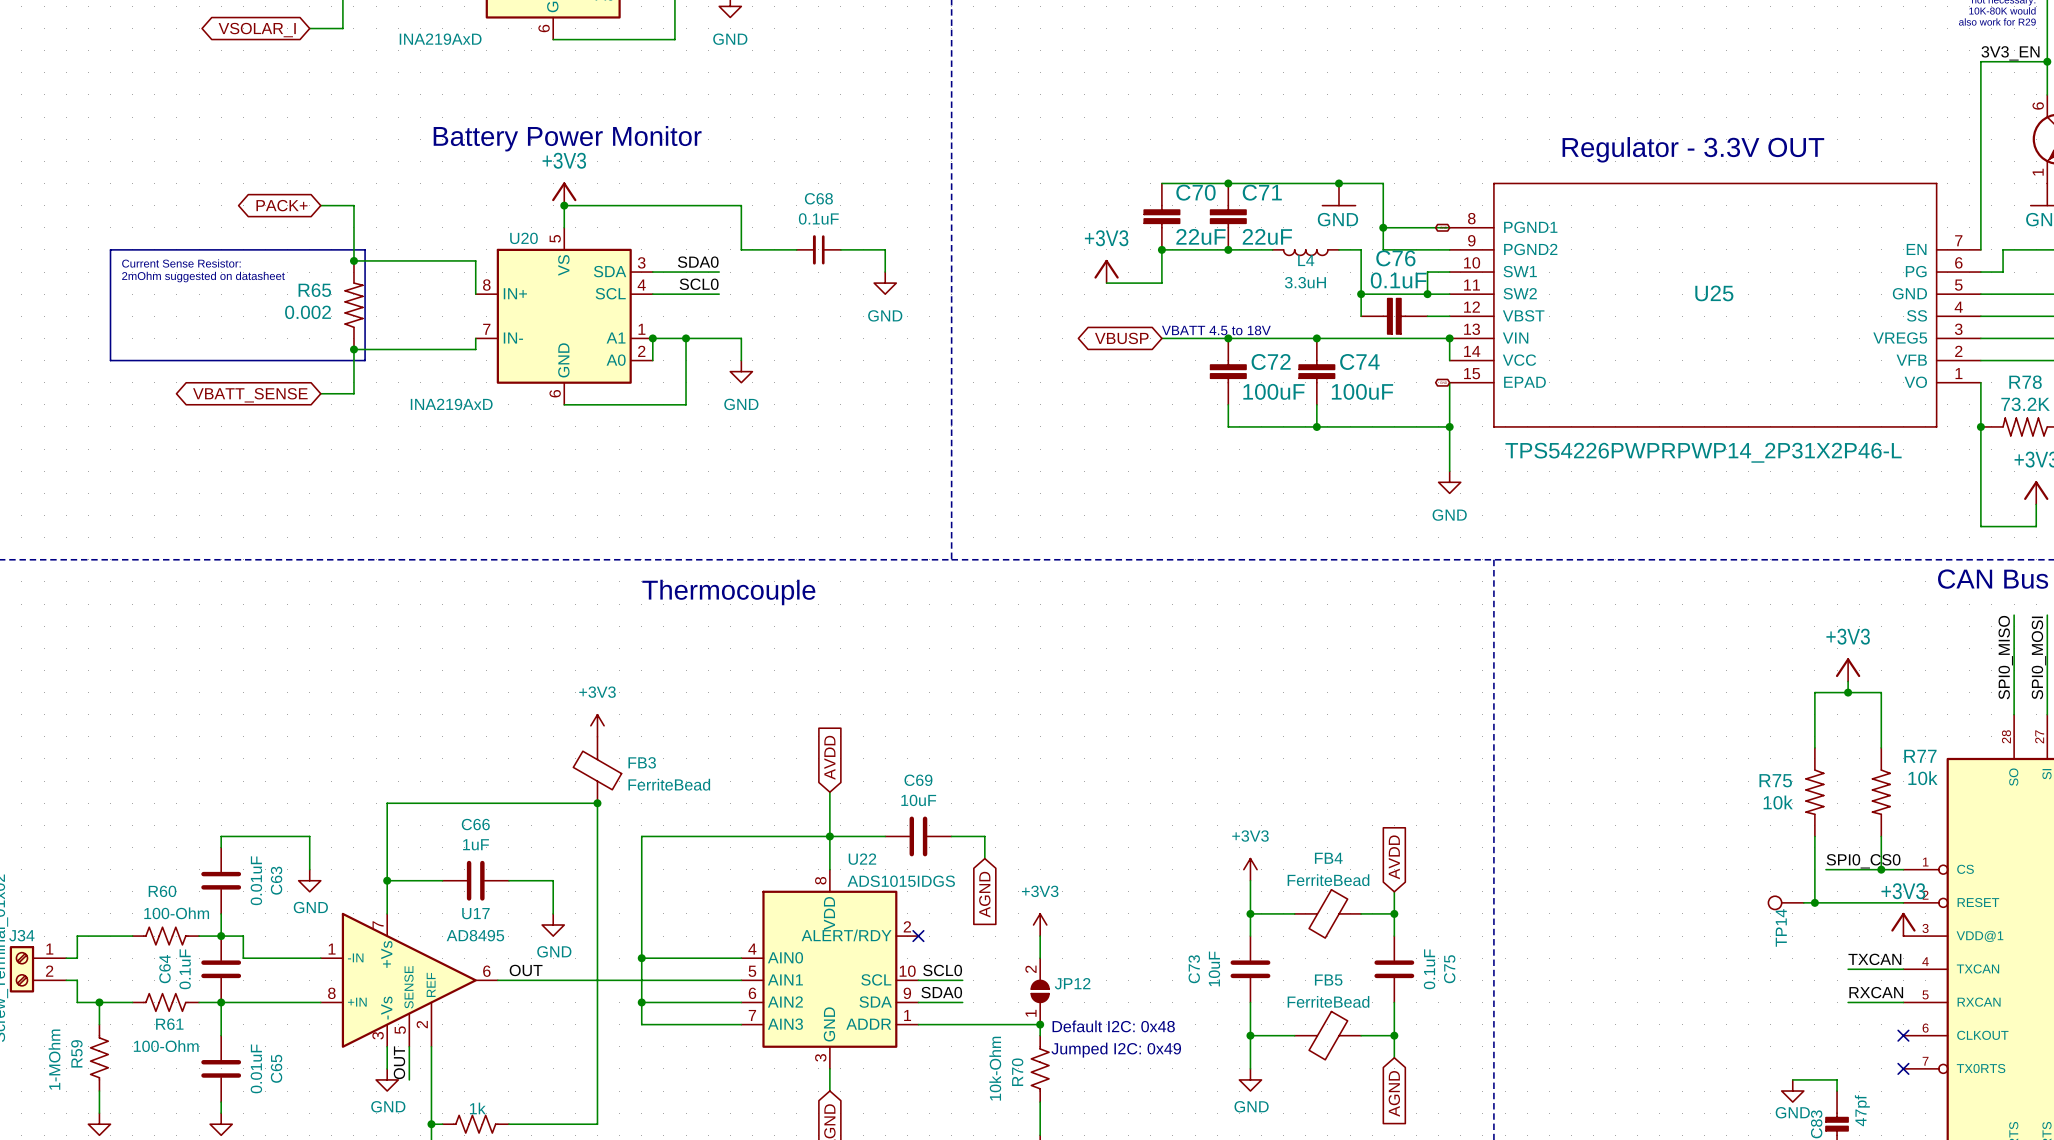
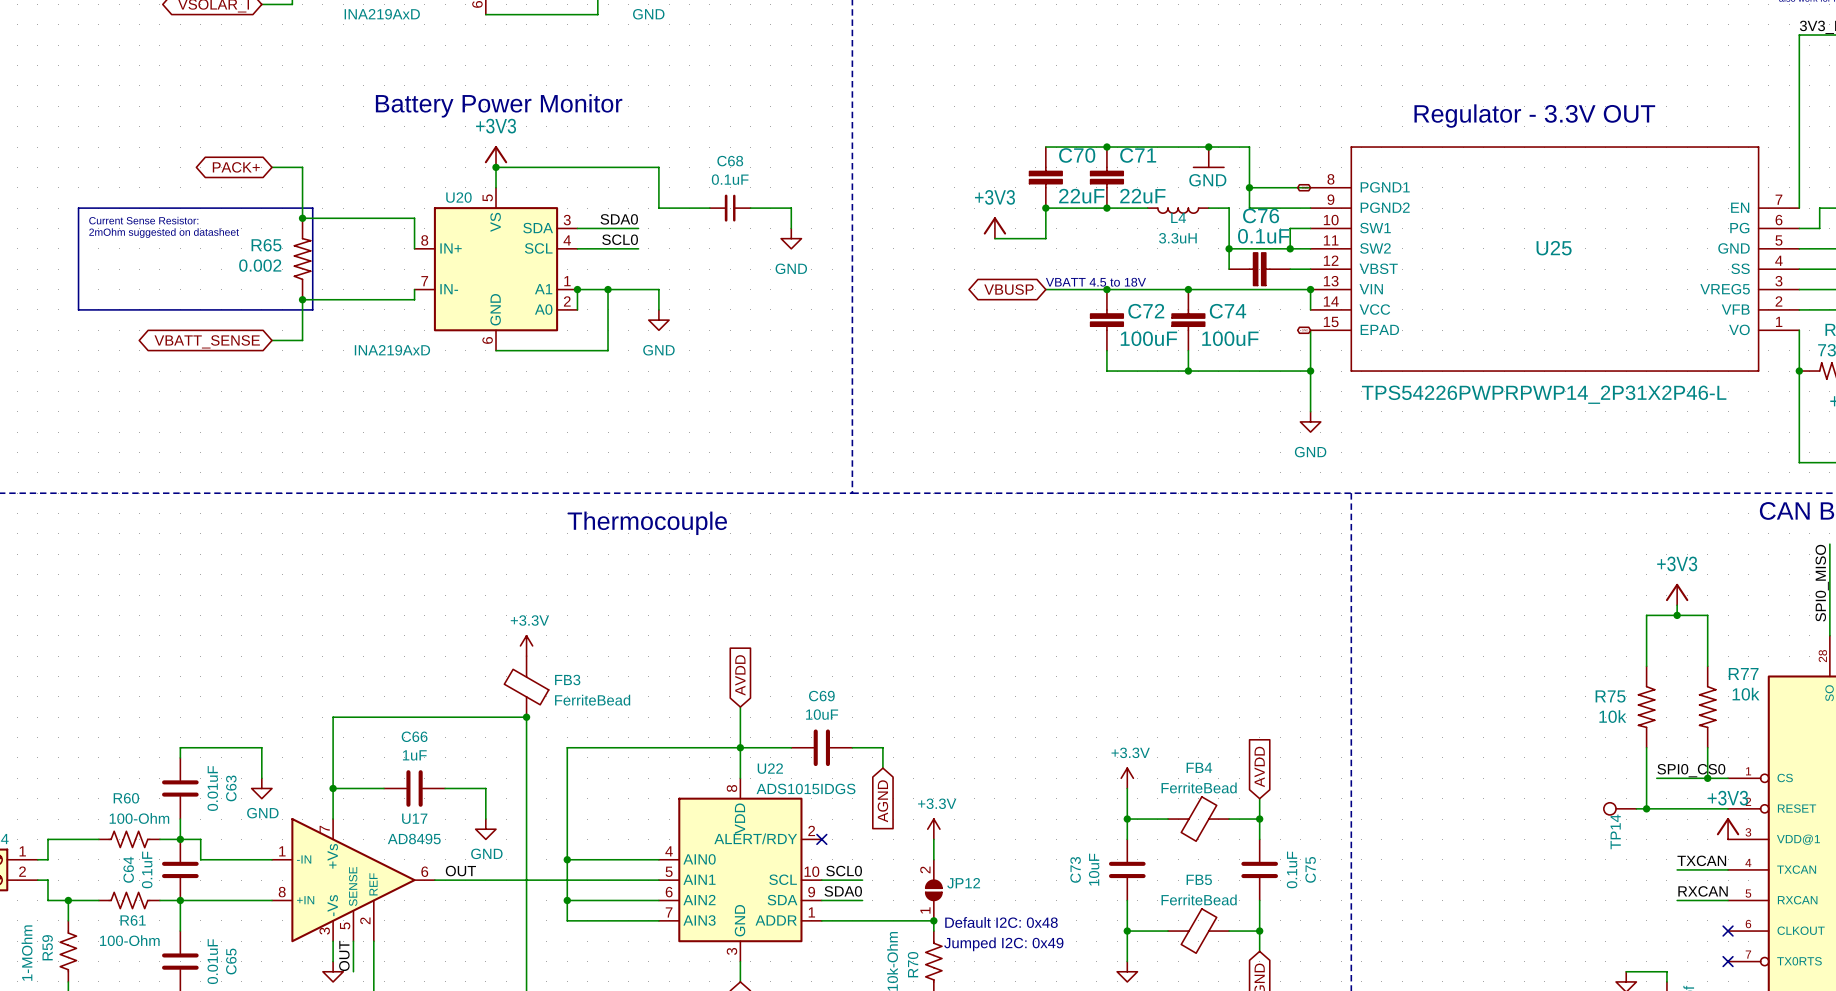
power symbol: +3V3 (597, 725) -> +3.3V (526, 645)
power symbol: +3V3 (1250, 869) -> +3.3V (1127, 778)
power symbol: +3V3 (1040, 925) -> +3.3V (933, 829)

